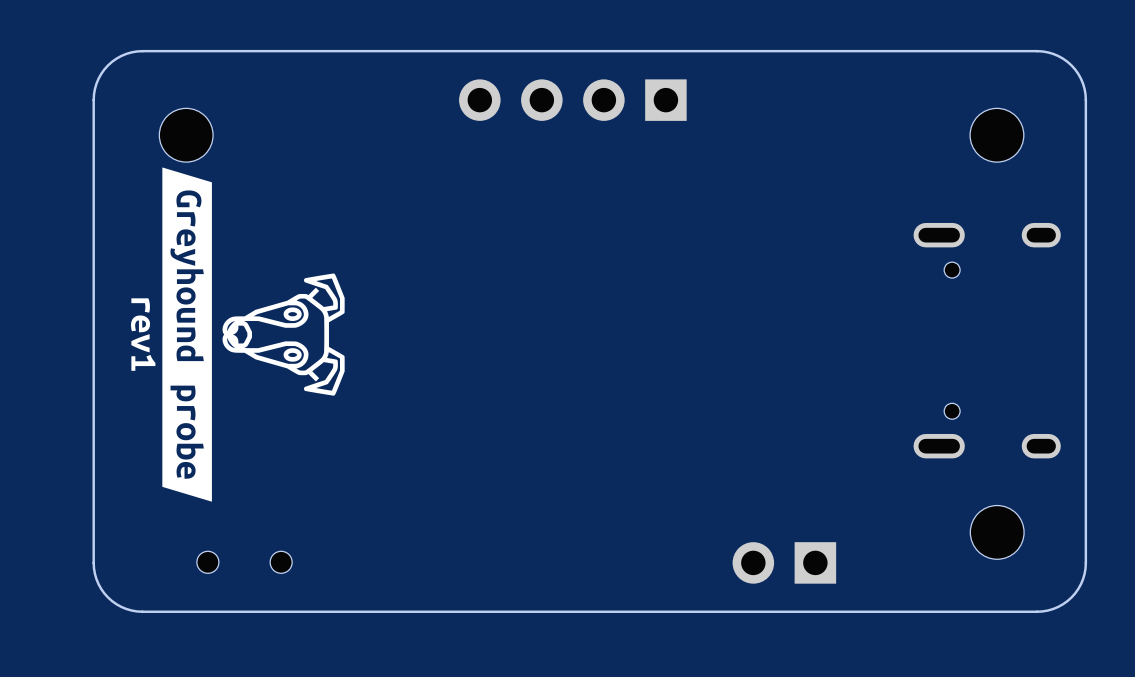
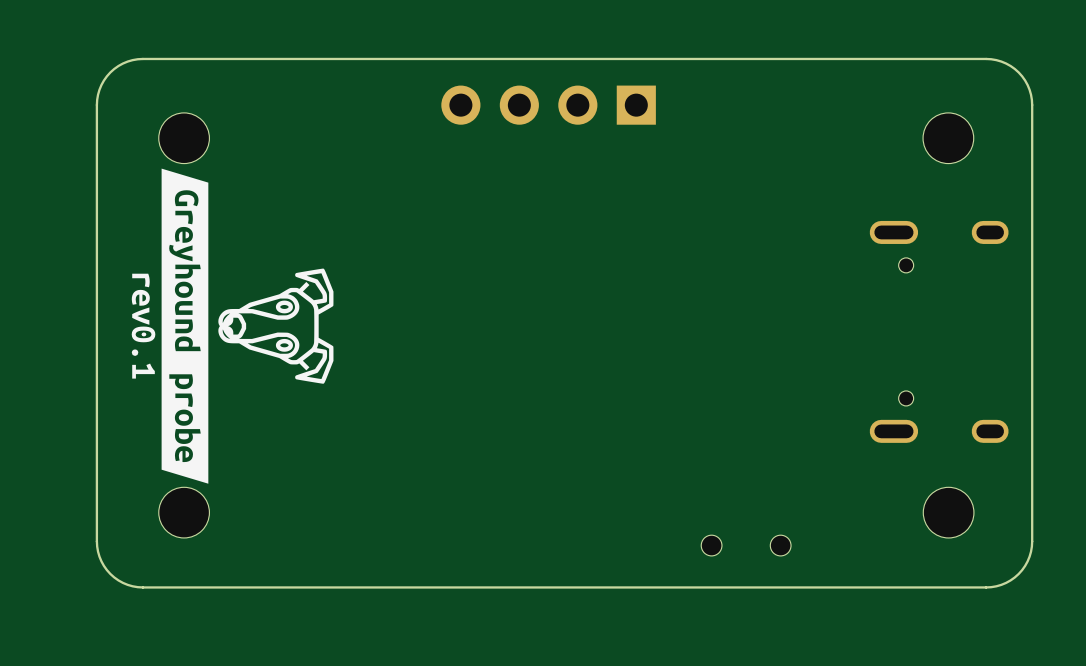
drawing shape: [130, 298, 156, 371] -> [131, 273, 156, 379]
part: none -> (184, 512)
part footprint: [732, 542, 837, 584] -> [701, 535, 792, 556]
part: (244, 562) -> none

